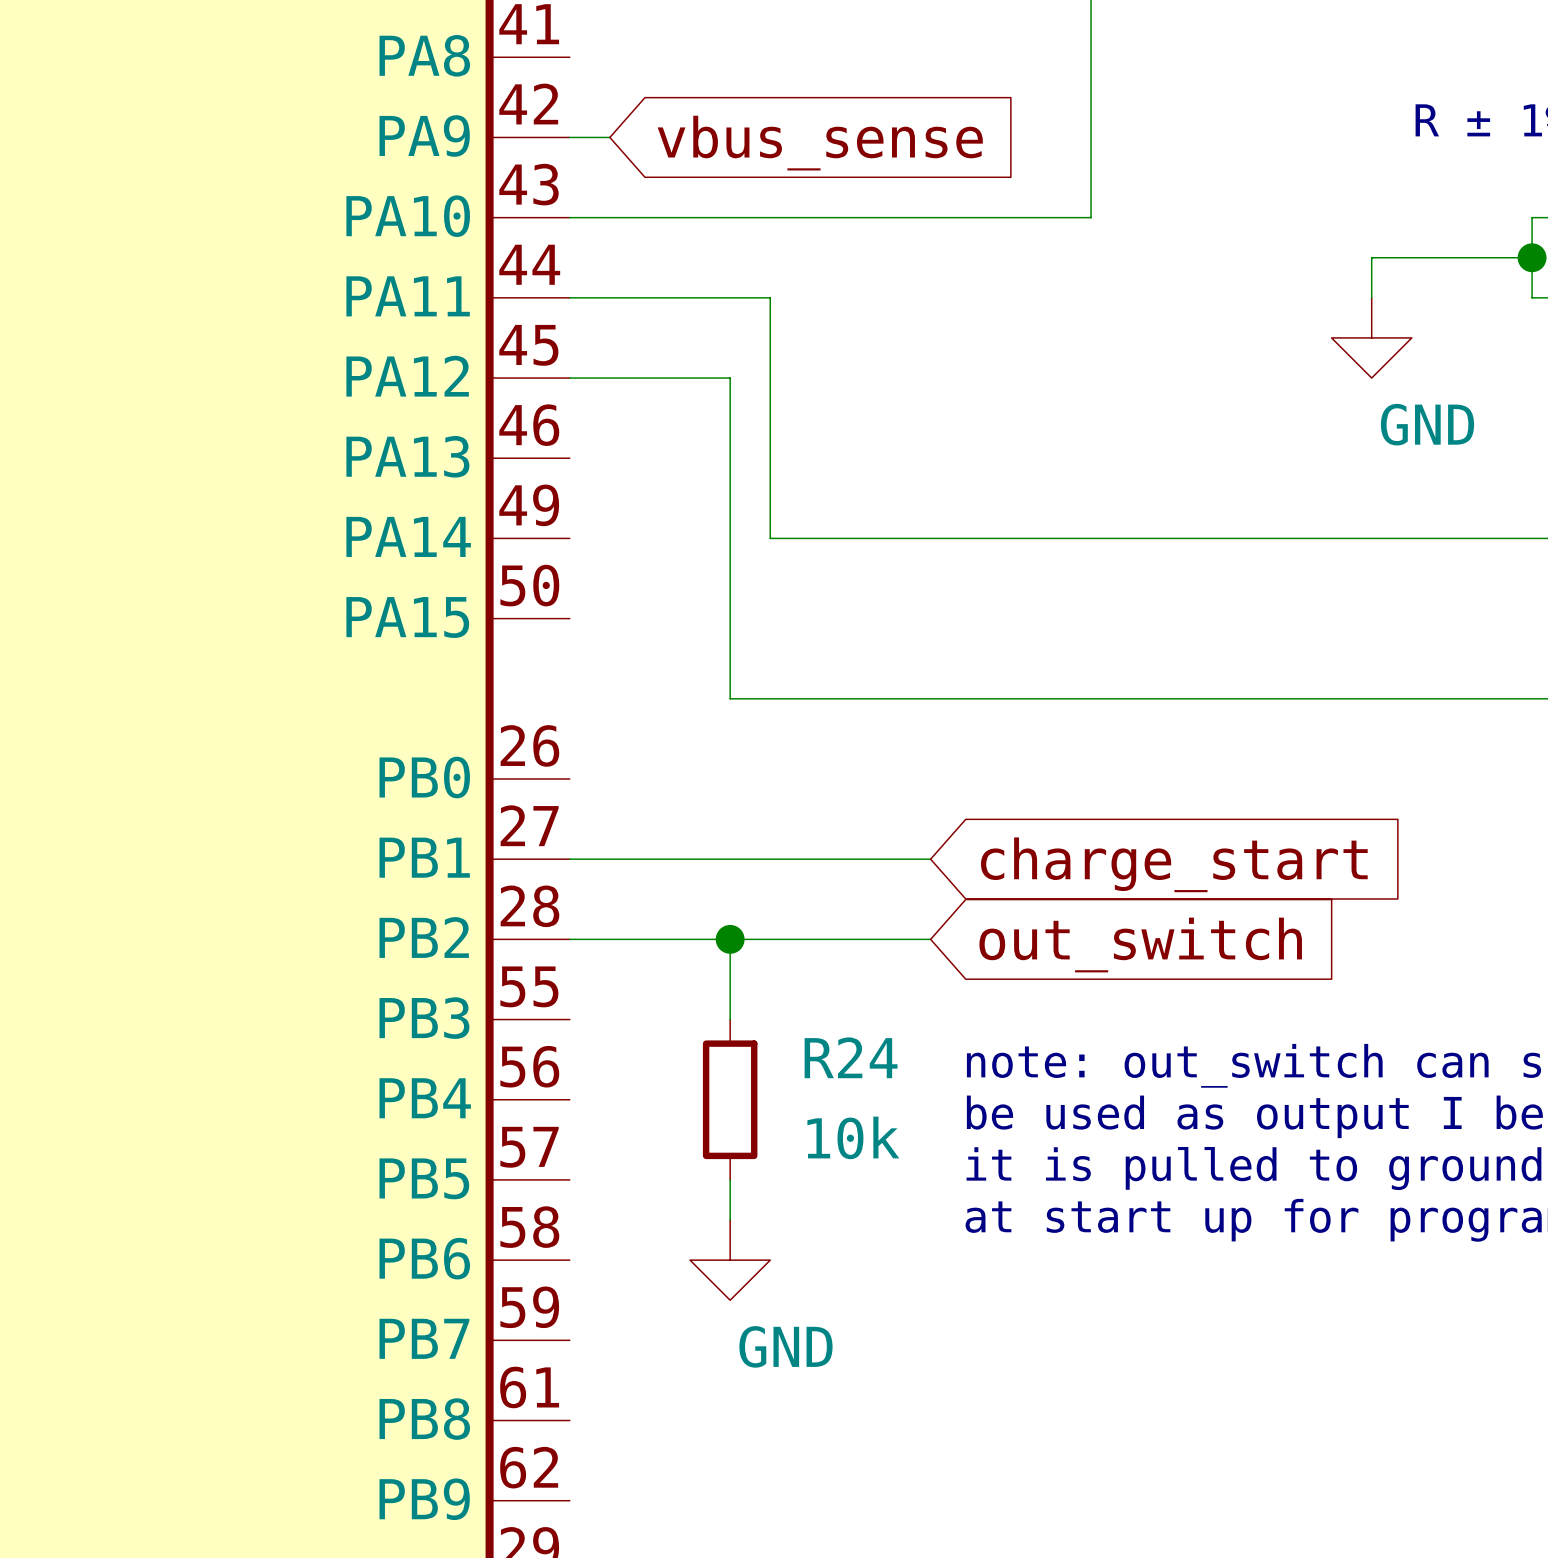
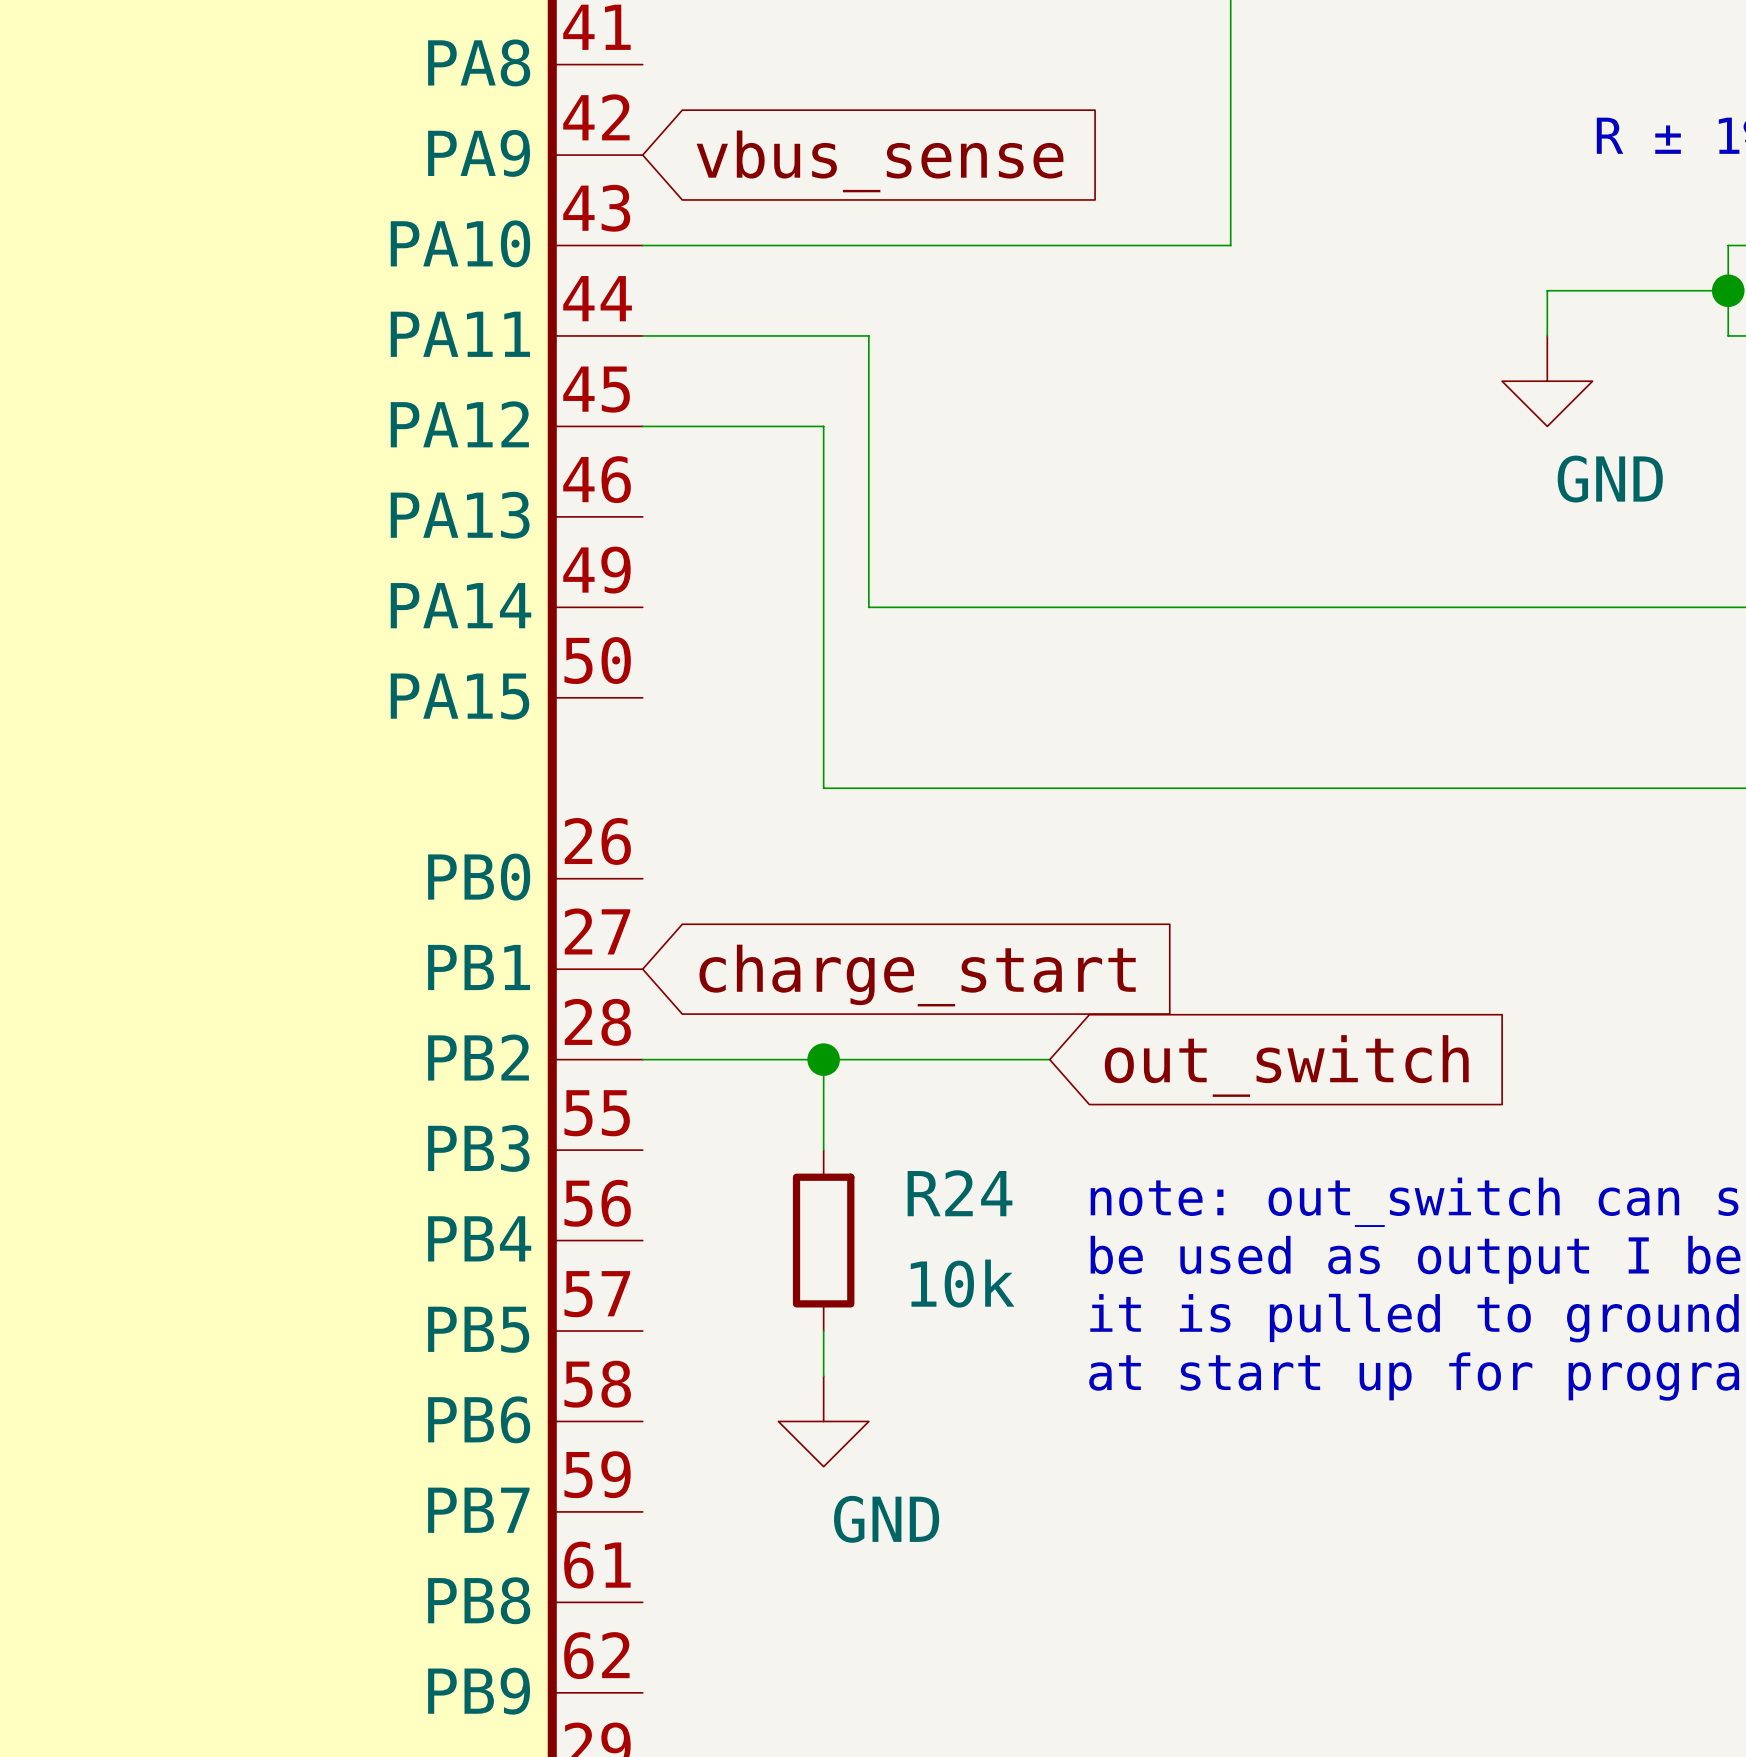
wire: (569, 137) (609, 137) -> none
global label position: vbus_sense (820, 143) -> vbus_sense (880, 161)
wire: (569, 859) (930, 859) -> none
global label position: charge_start (1174, 864) -> charge_start (917, 975)

